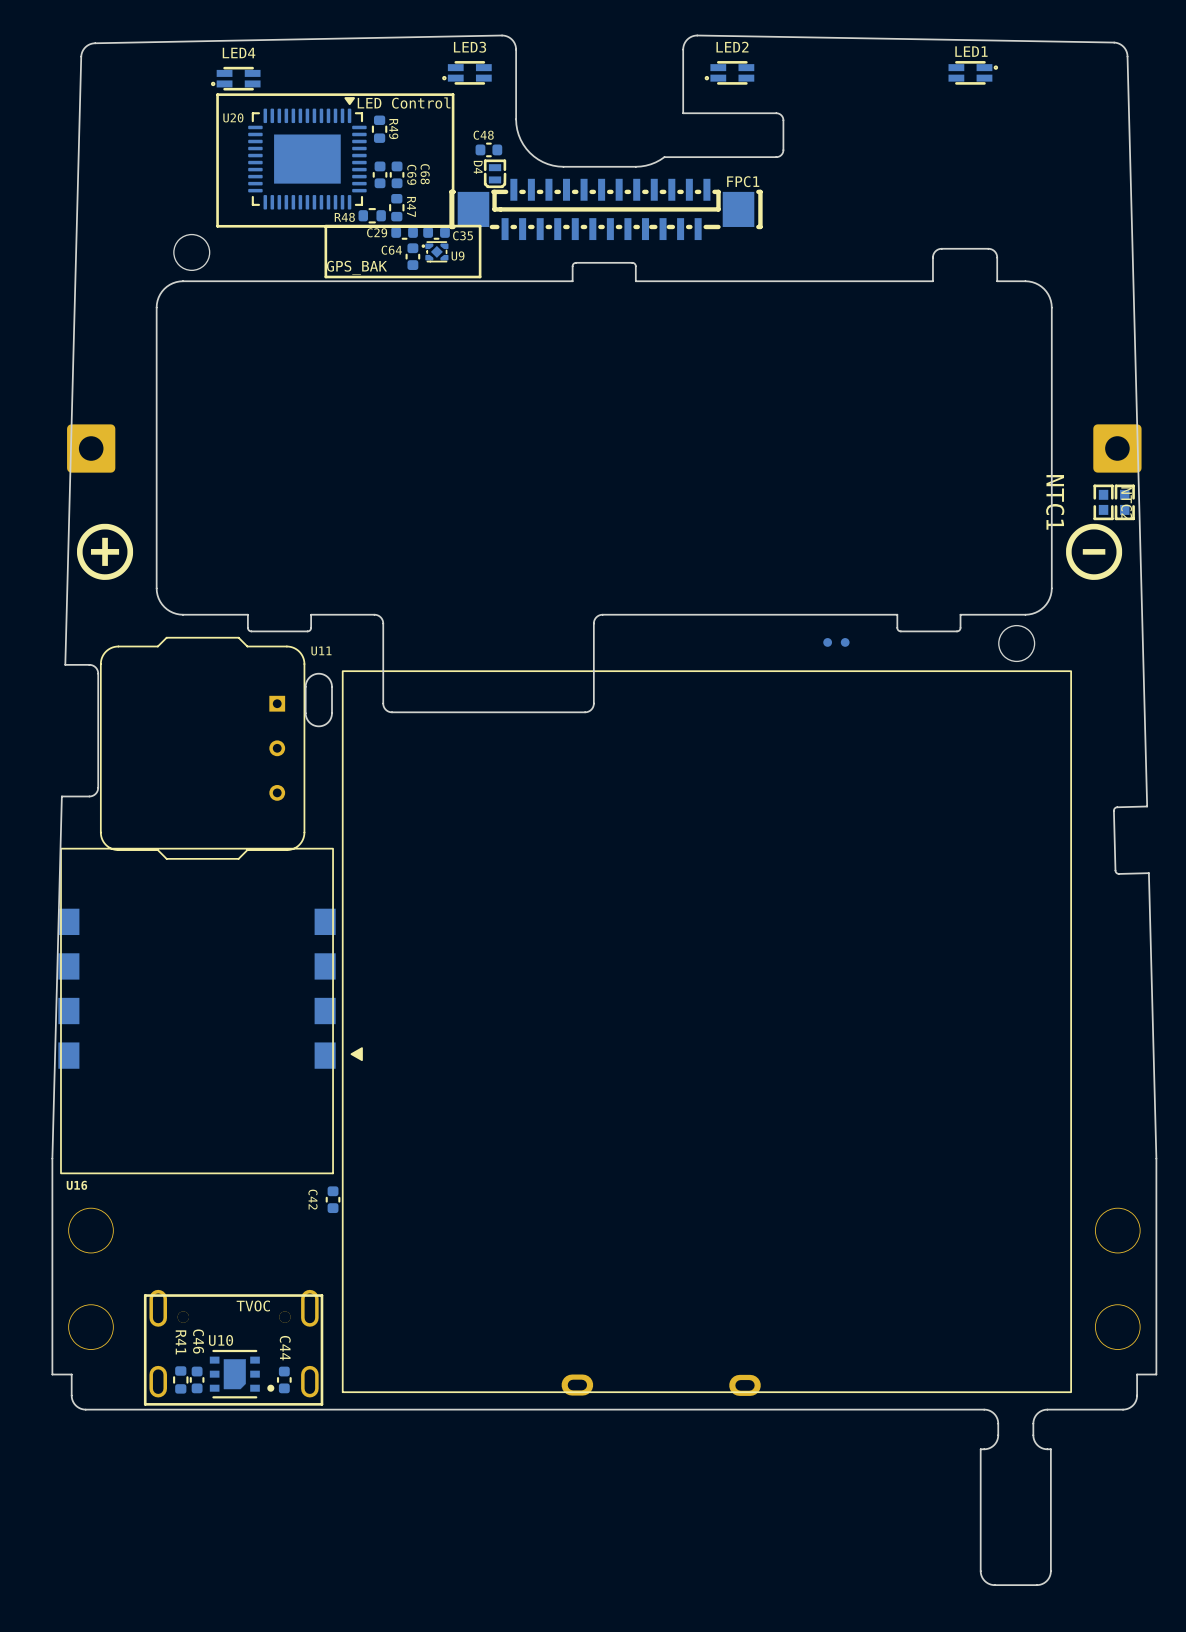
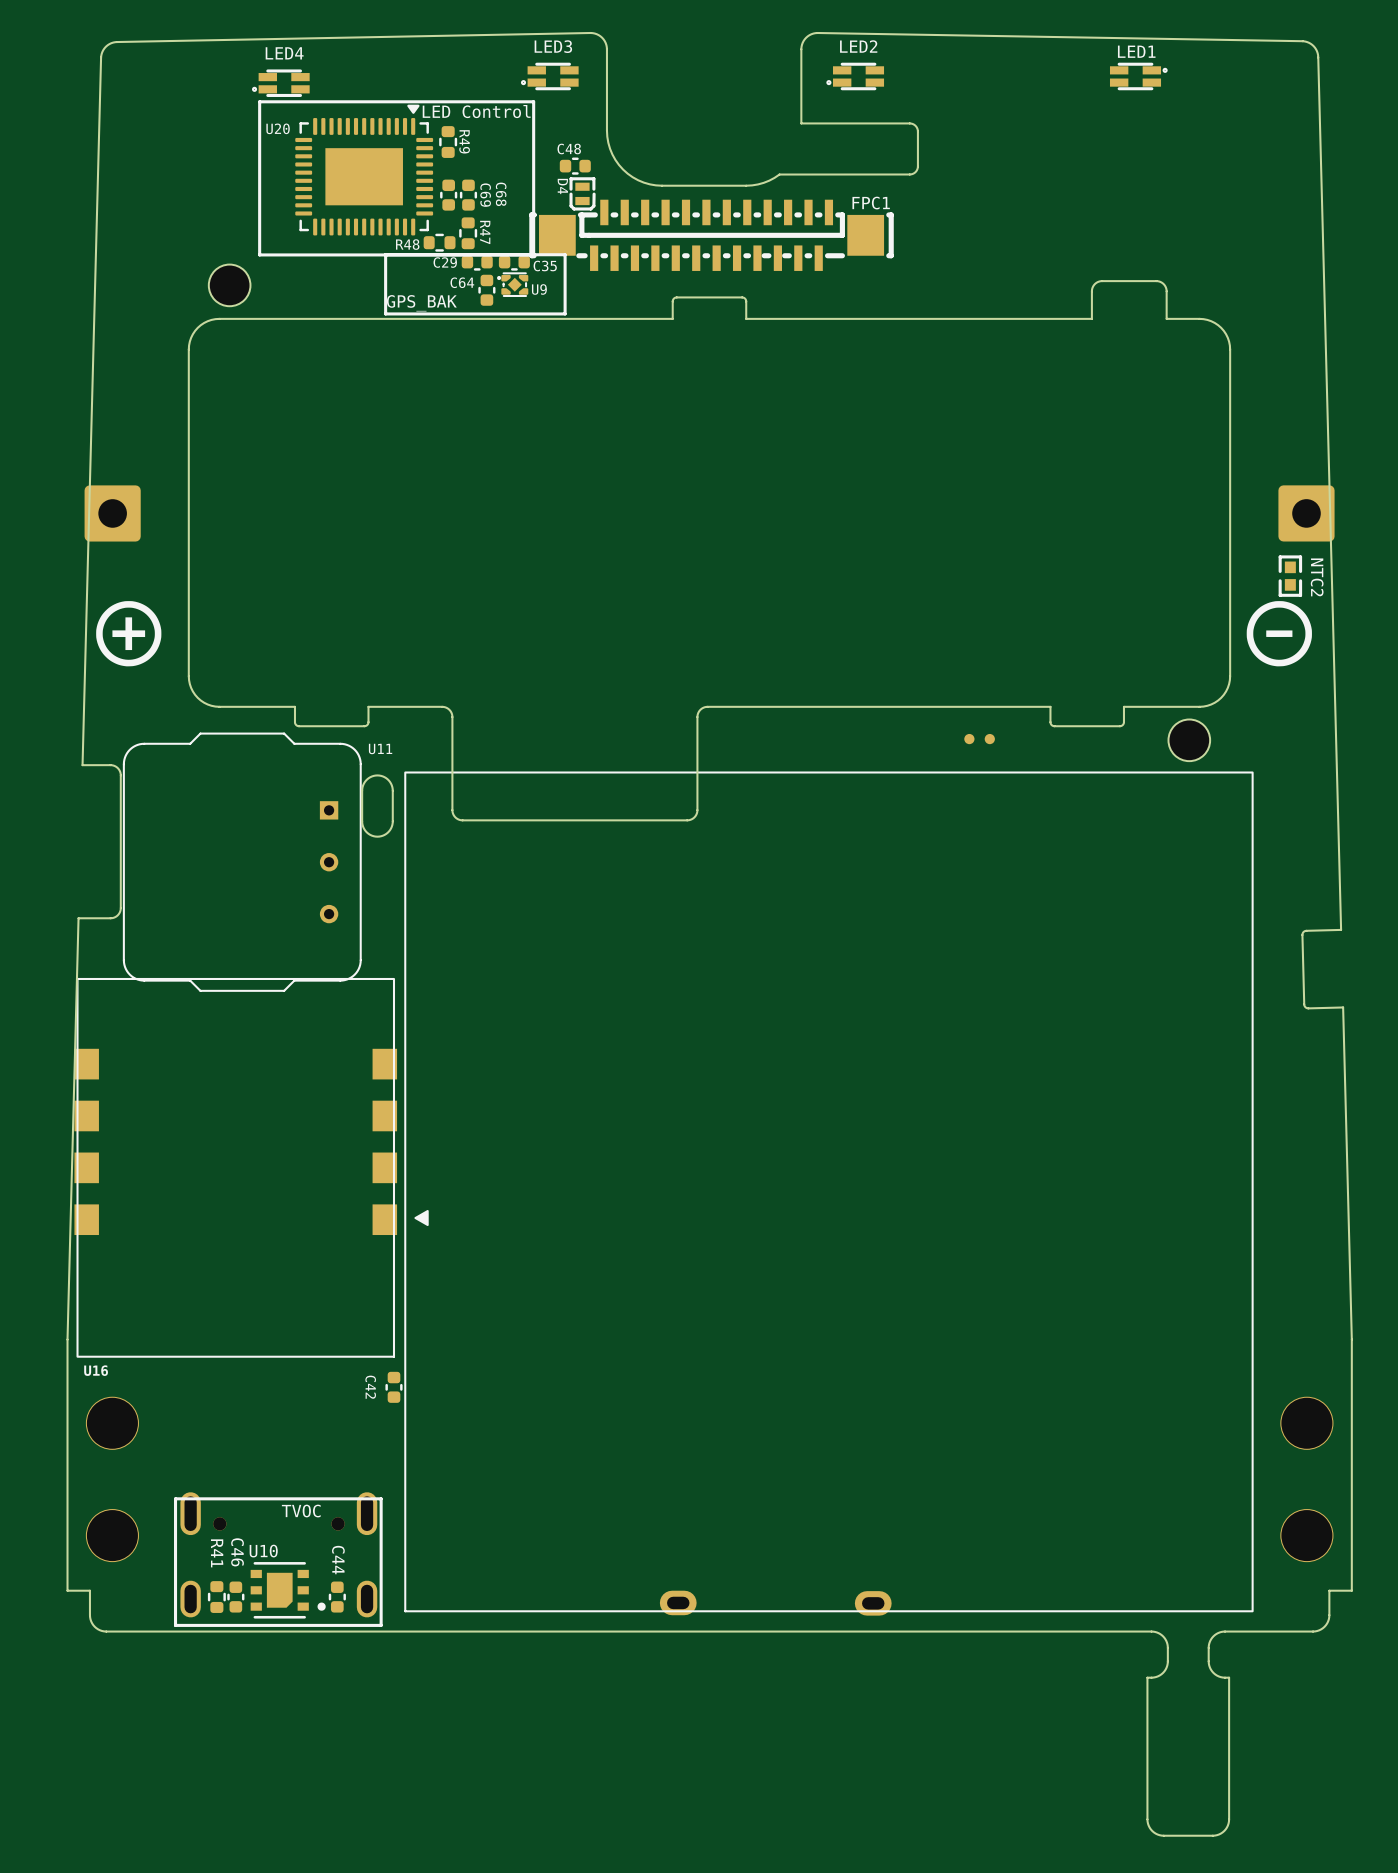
NTC1: (1124, 502) -> none

